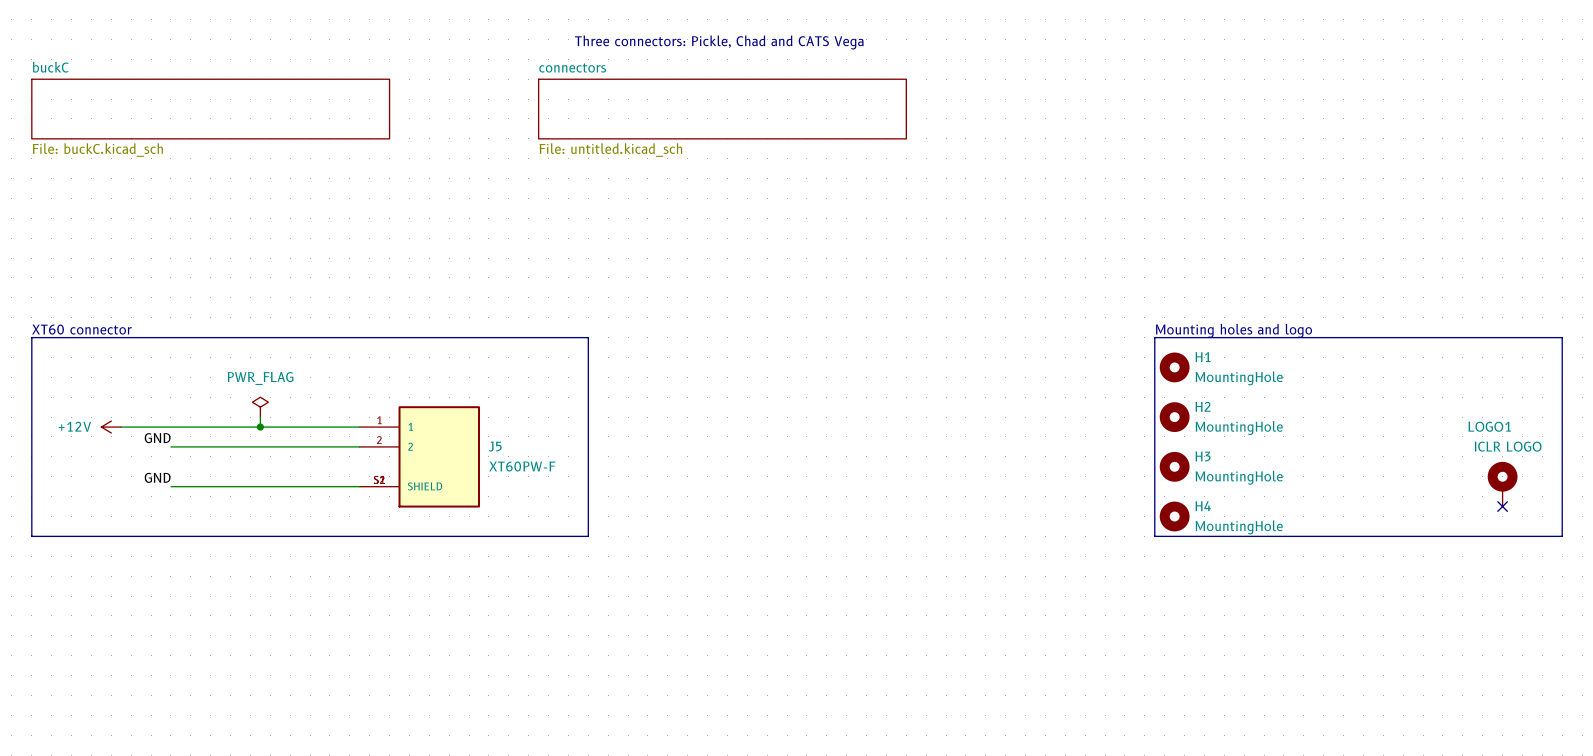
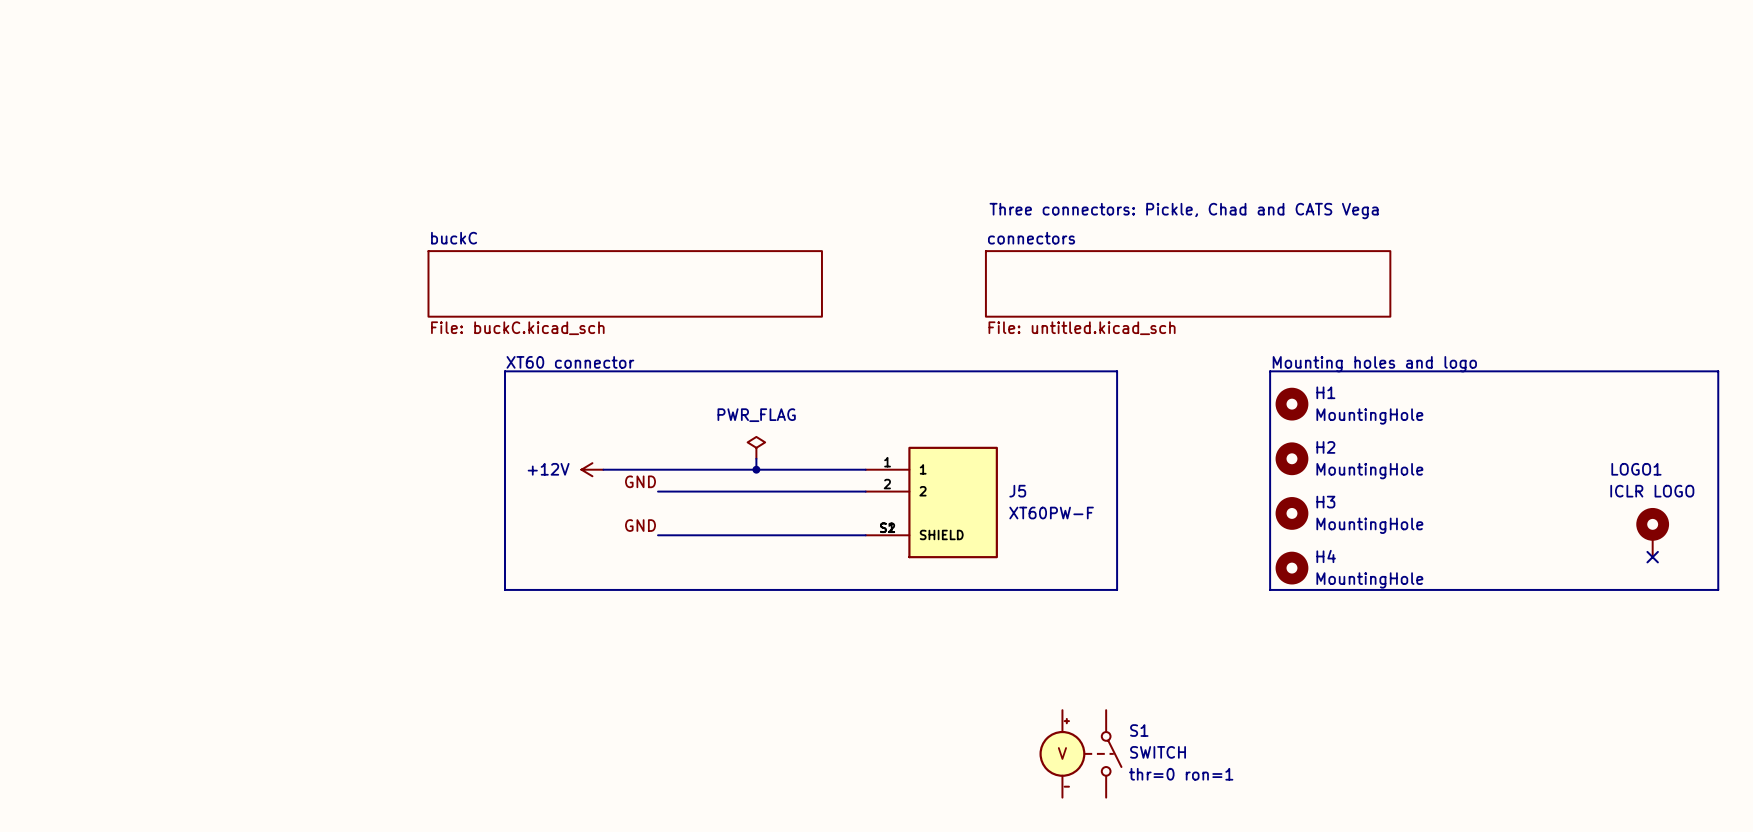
text: Three connectors: Pickle, Chad and CATS Vega (719, 42) -> none
sheet buckC: File: buckC.kicad_sch (210, 109) -> none
sheet connectors: File: untitled.kicad_sch (722, 109) -> none
text: none -> Three connectors: Pickle, Chad and CATS Vega (1184, 211)
sheet buckC: none -> File: buckC.kicad_sch (625, 283)
sheet connectors: none -> File: untitled.kicad_sch (1188, 283)
text: XT60 connector (82, 329) -> none
text: none -> XT60 connector (570, 362)
line: (459, 337) (31, 337) (31, 536) (459, 536) -> (504, 371) (504, 589)
line: (588, 337) (588, 536) -> (647, 371) (1117, 371) (1117, 589) (647, 589)
power symbol: PWR_FLAG (260, 407) -> none
power symbol: none -> PWR_FLAG (756, 447)
wire: (260, 417) (260, 427) -> none
wire: none -> (756, 458) (756, 469)
power symbol: +12V (111, 427) -> none
wire: (121, 427) (359, 427) -> none
junction: (260, 427) -> none
power symbol: none -> +12V (592, 469)
wire: none -> (603, 469) (865, 469)
junction: none -> (756, 469)
label: GND (157, 438) -> none
label: none -> GND (640, 481)
wire: (170, 446) (359, 446) -> none
wire: none -> (658, 491) (865, 491)
J5 position: (419, 456) -> (931, 502)
label: GND (157, 477) -> none
label: none -> GND (640, 525)
wire: (170, 486) (359, 486) -> none
wire: none -> (658, 535) (865, 535)
S1: none -> SWITCH (1080, 753)

